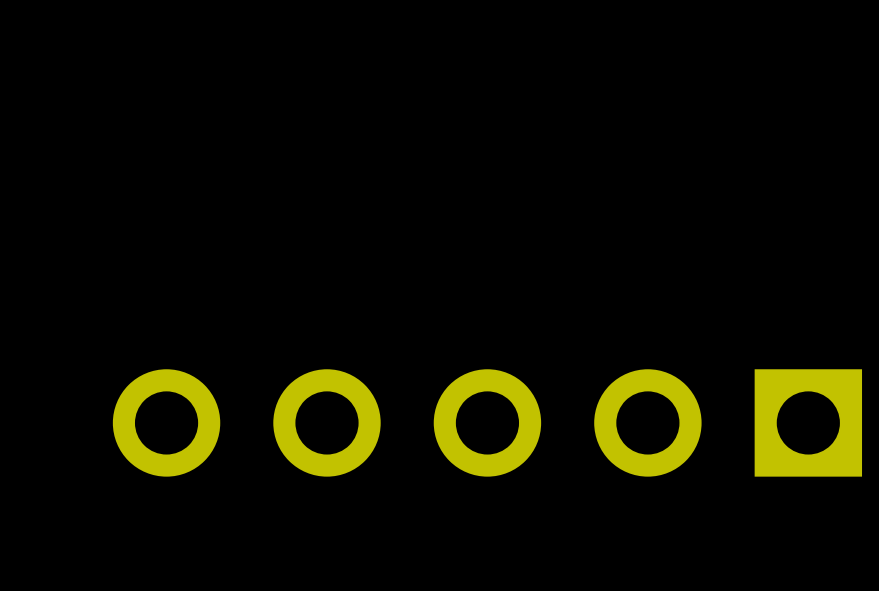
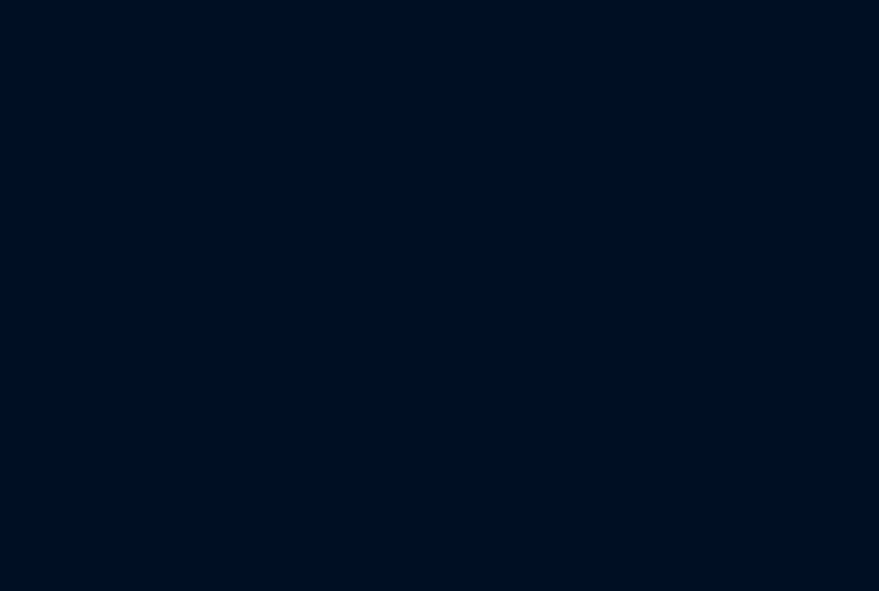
part: (487, 422) -> none

